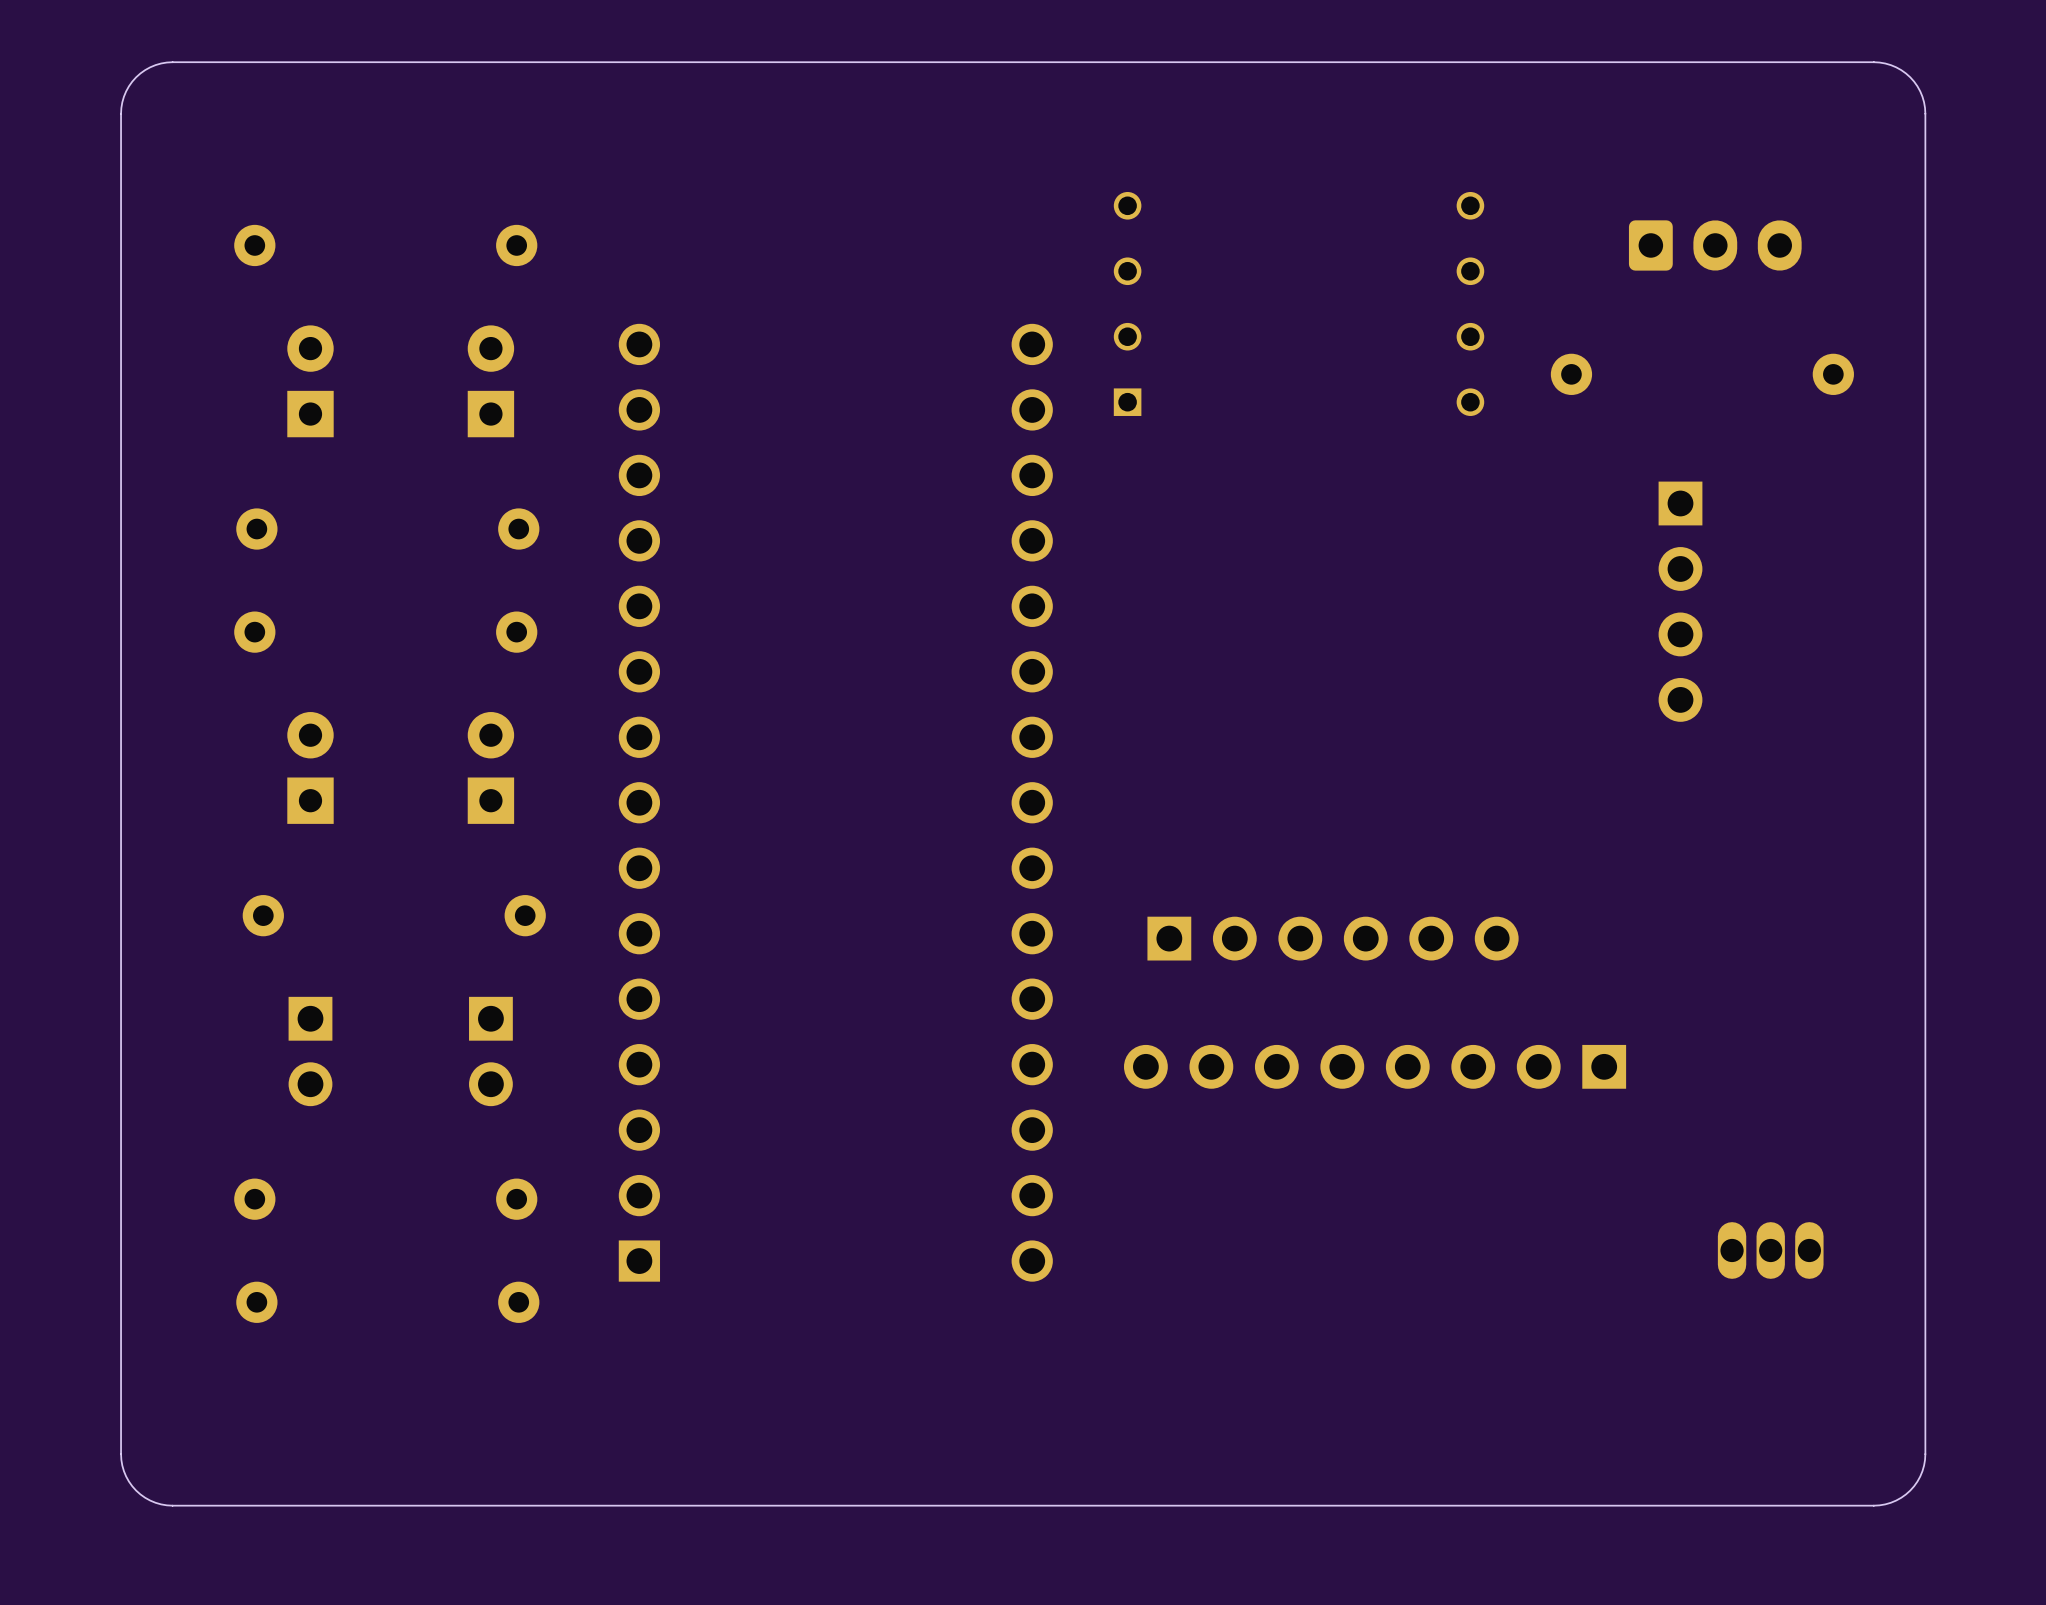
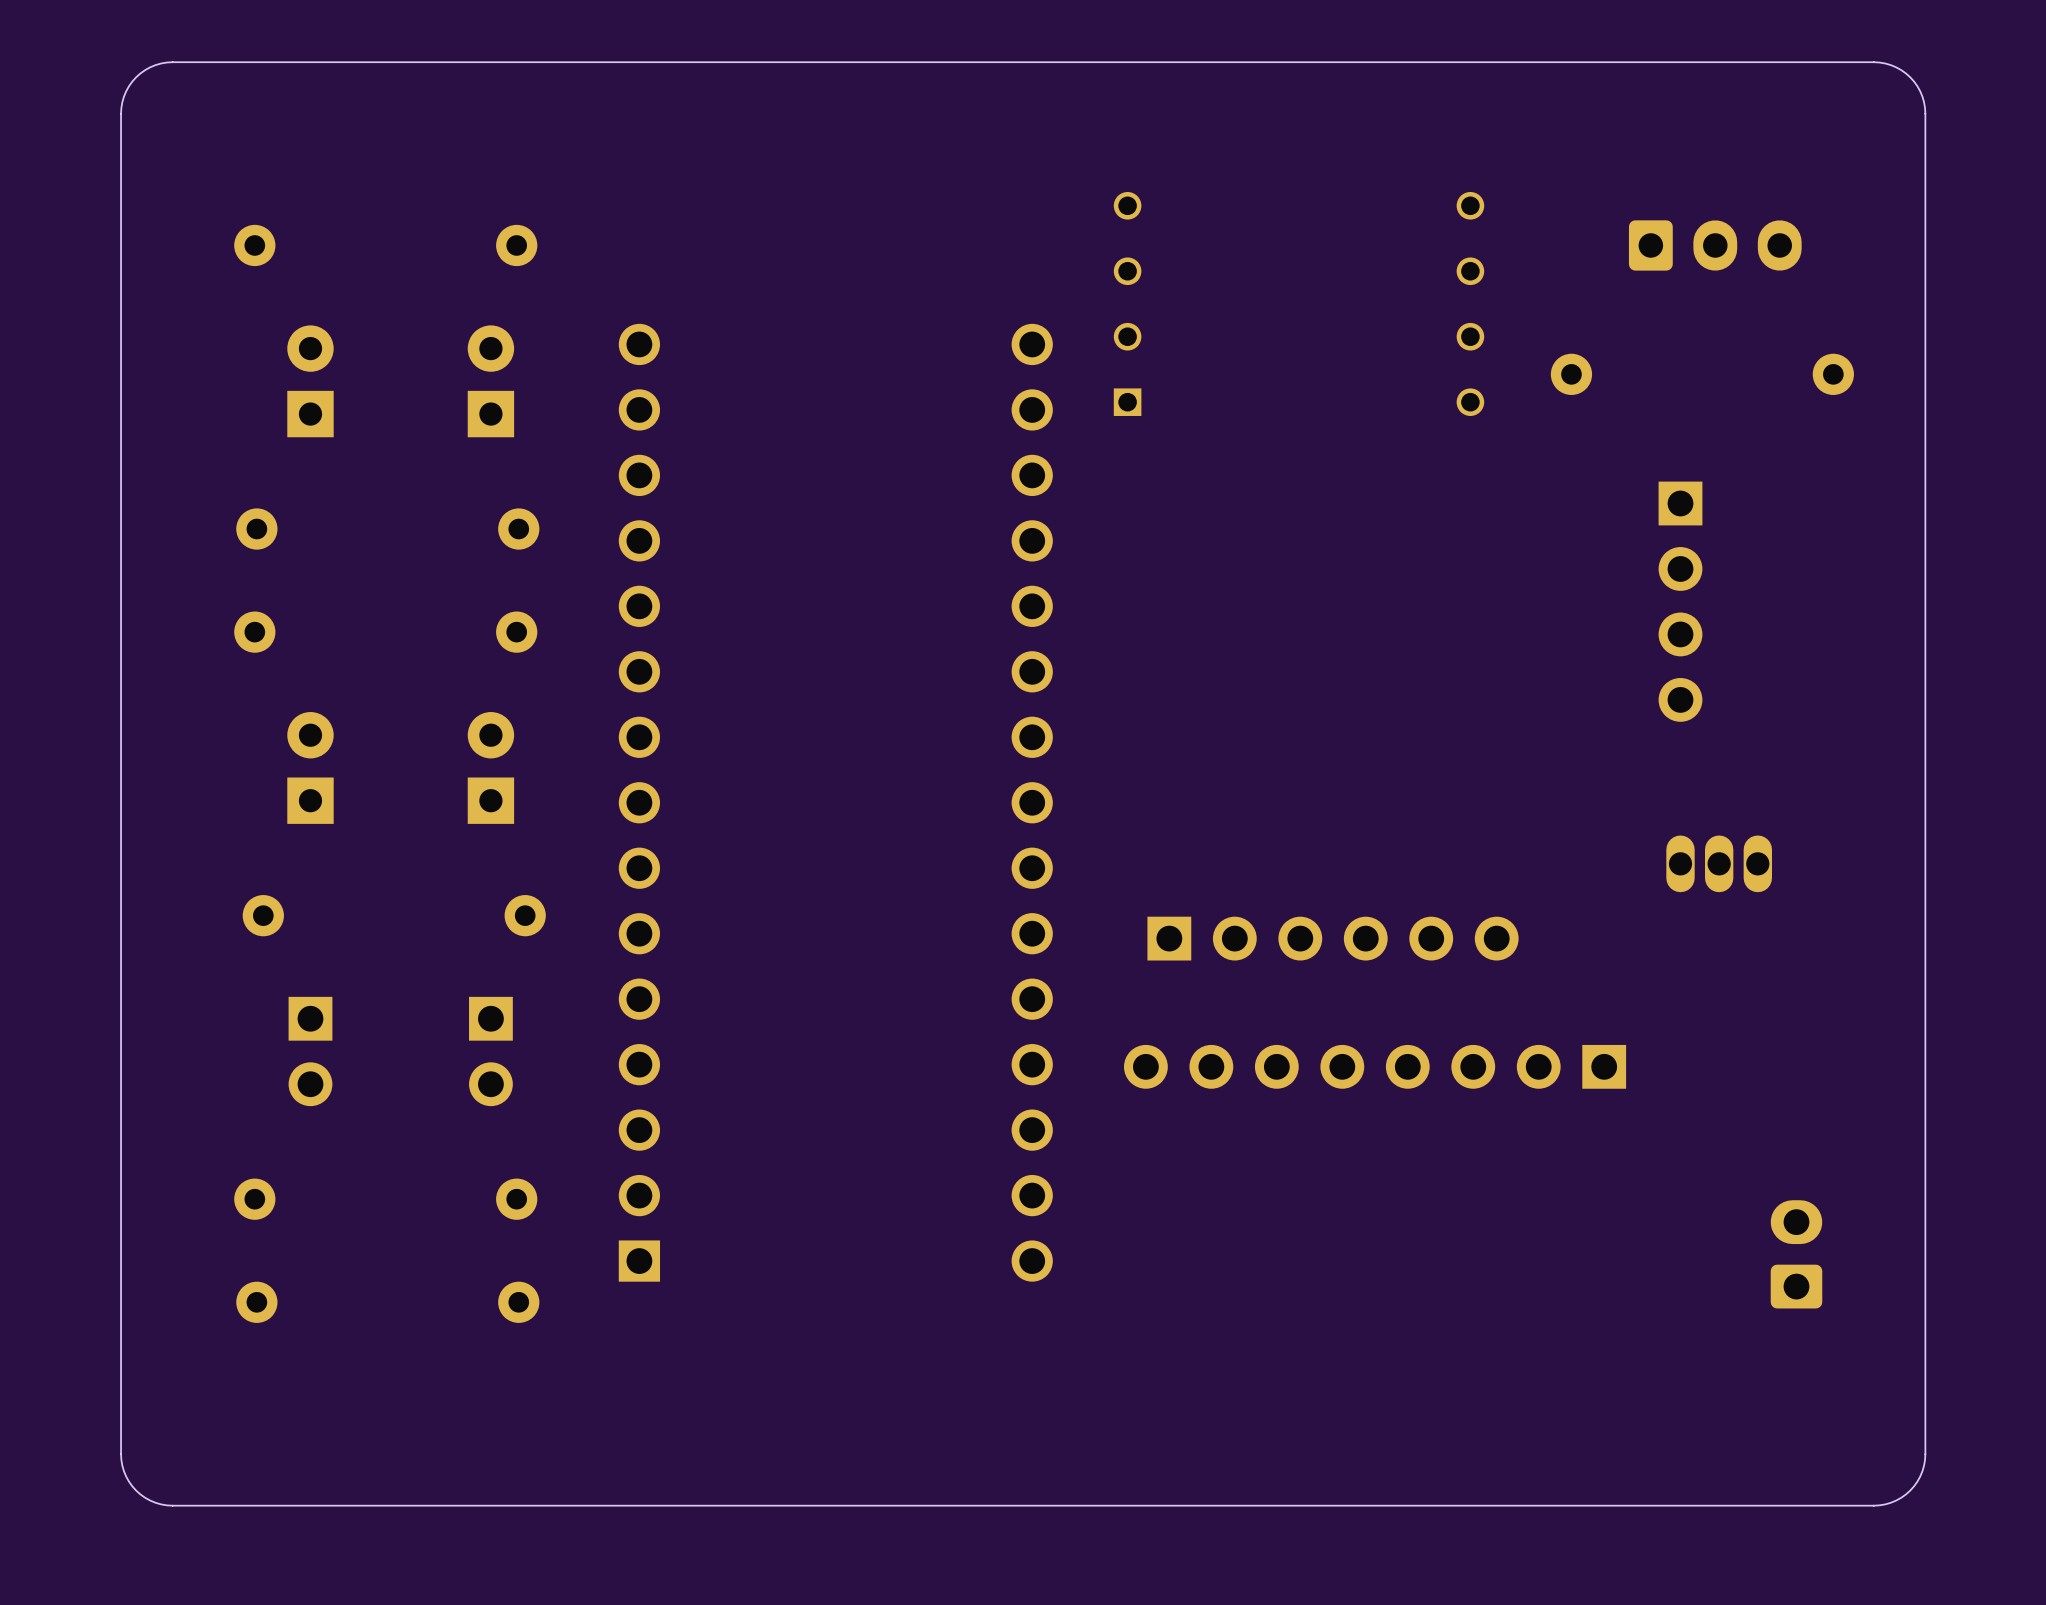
part position: (1770, 1250) -> (1719, 863)
part: none -> (1796, 1254)

